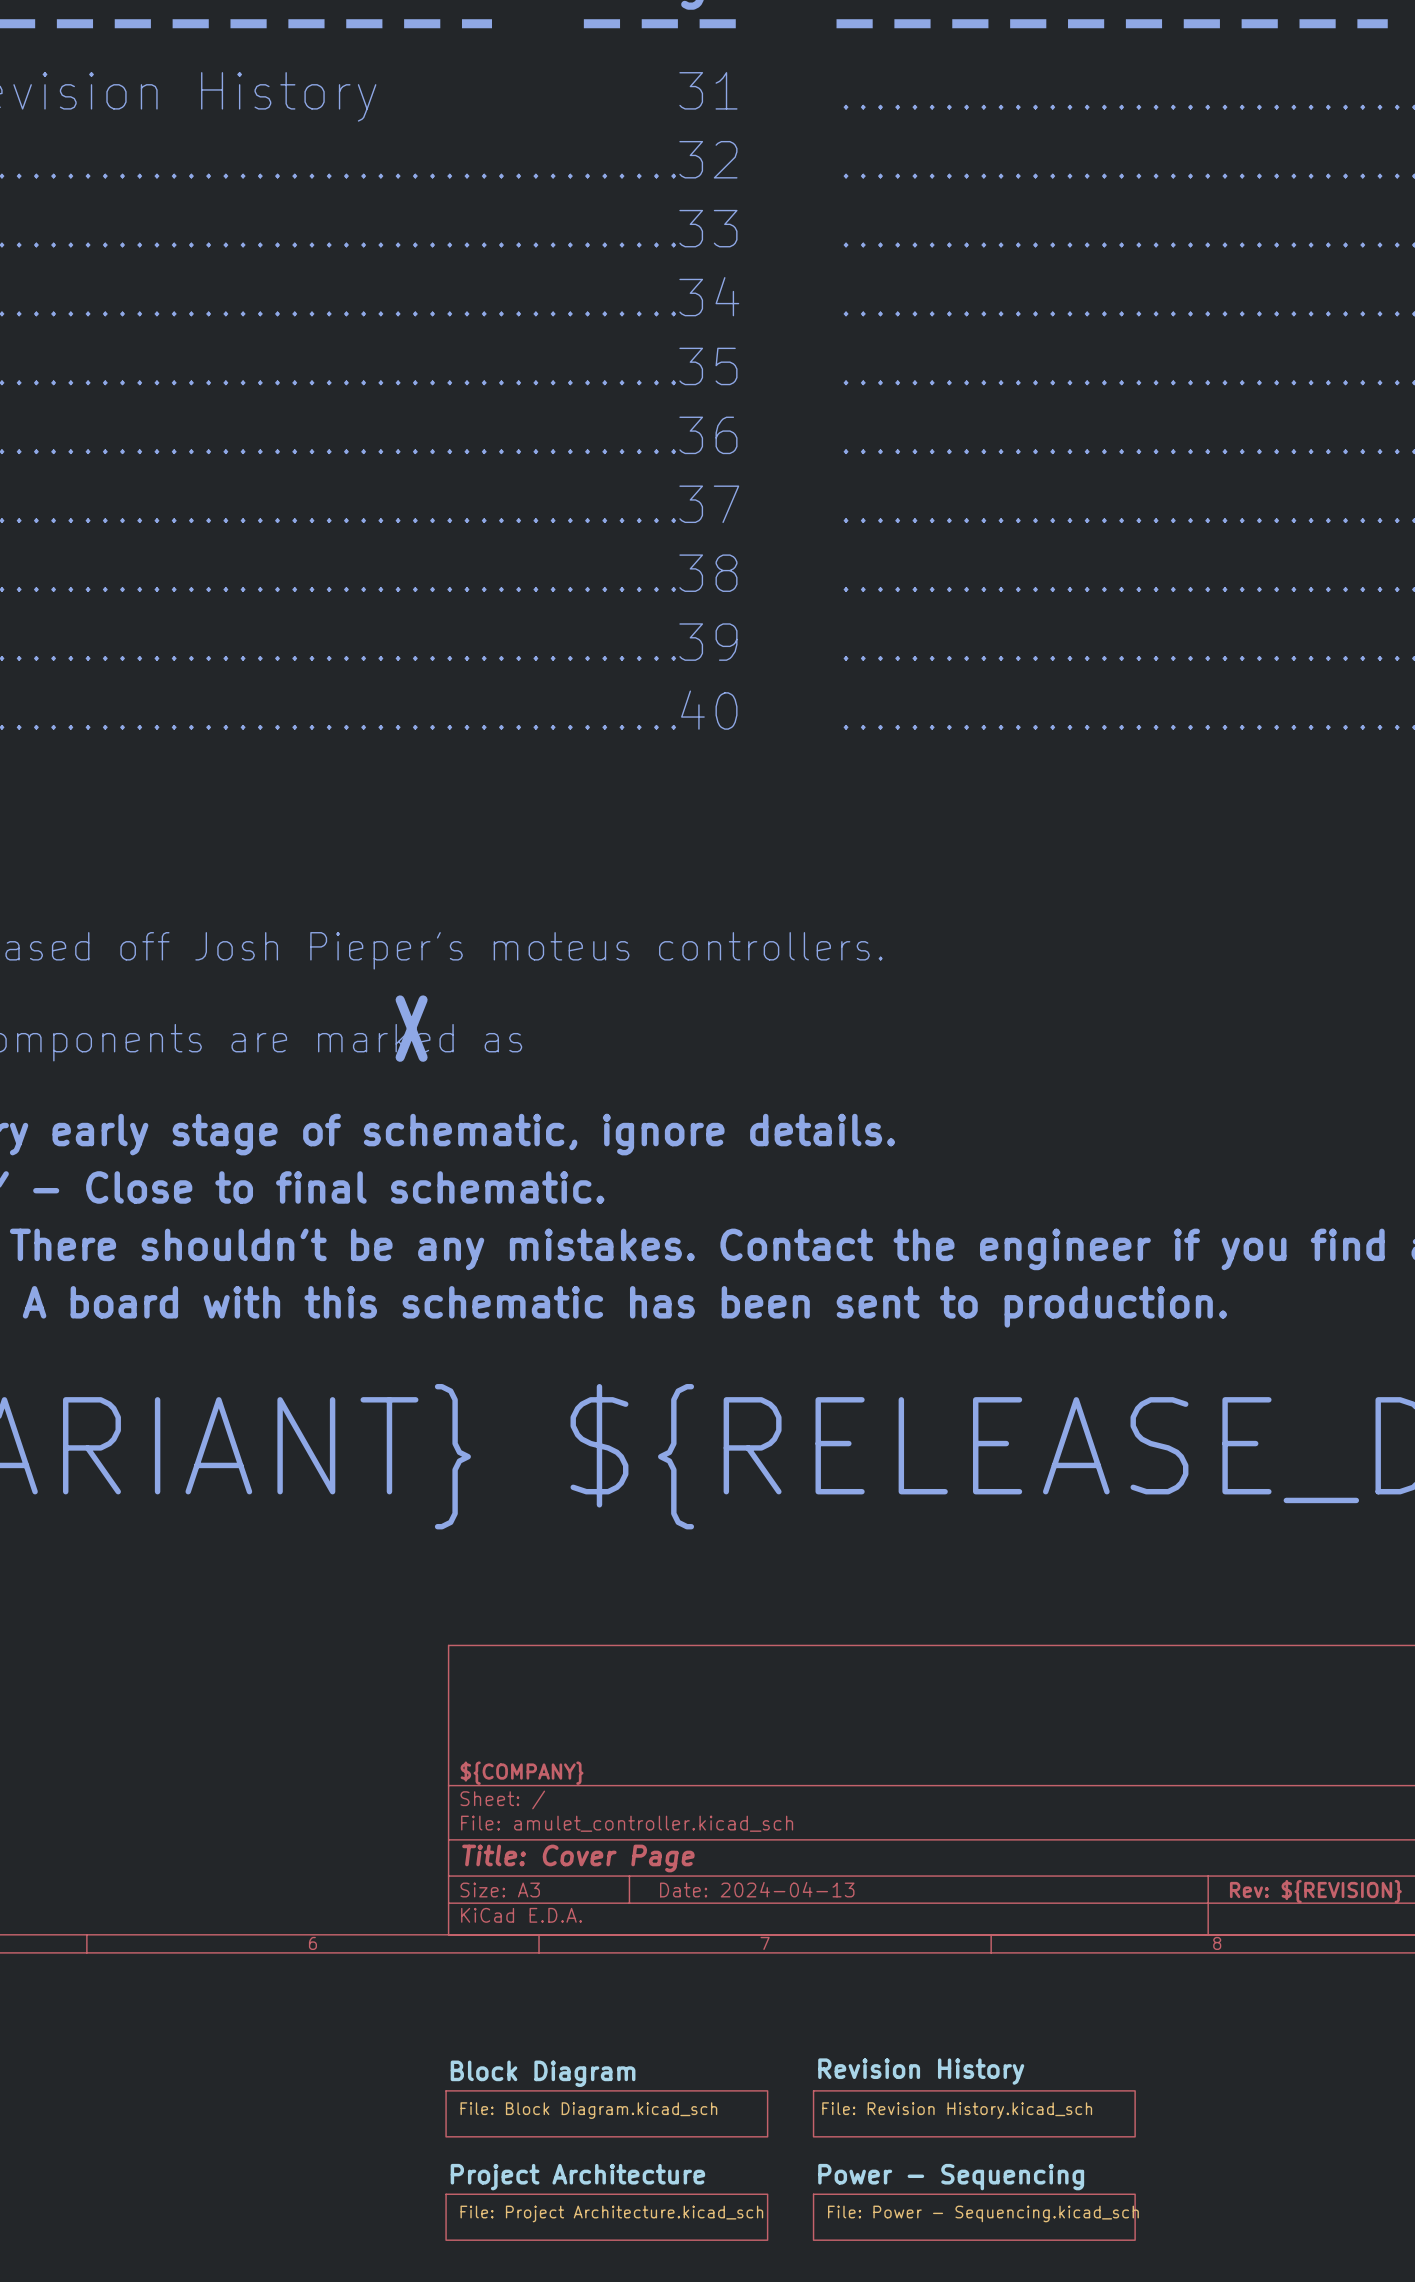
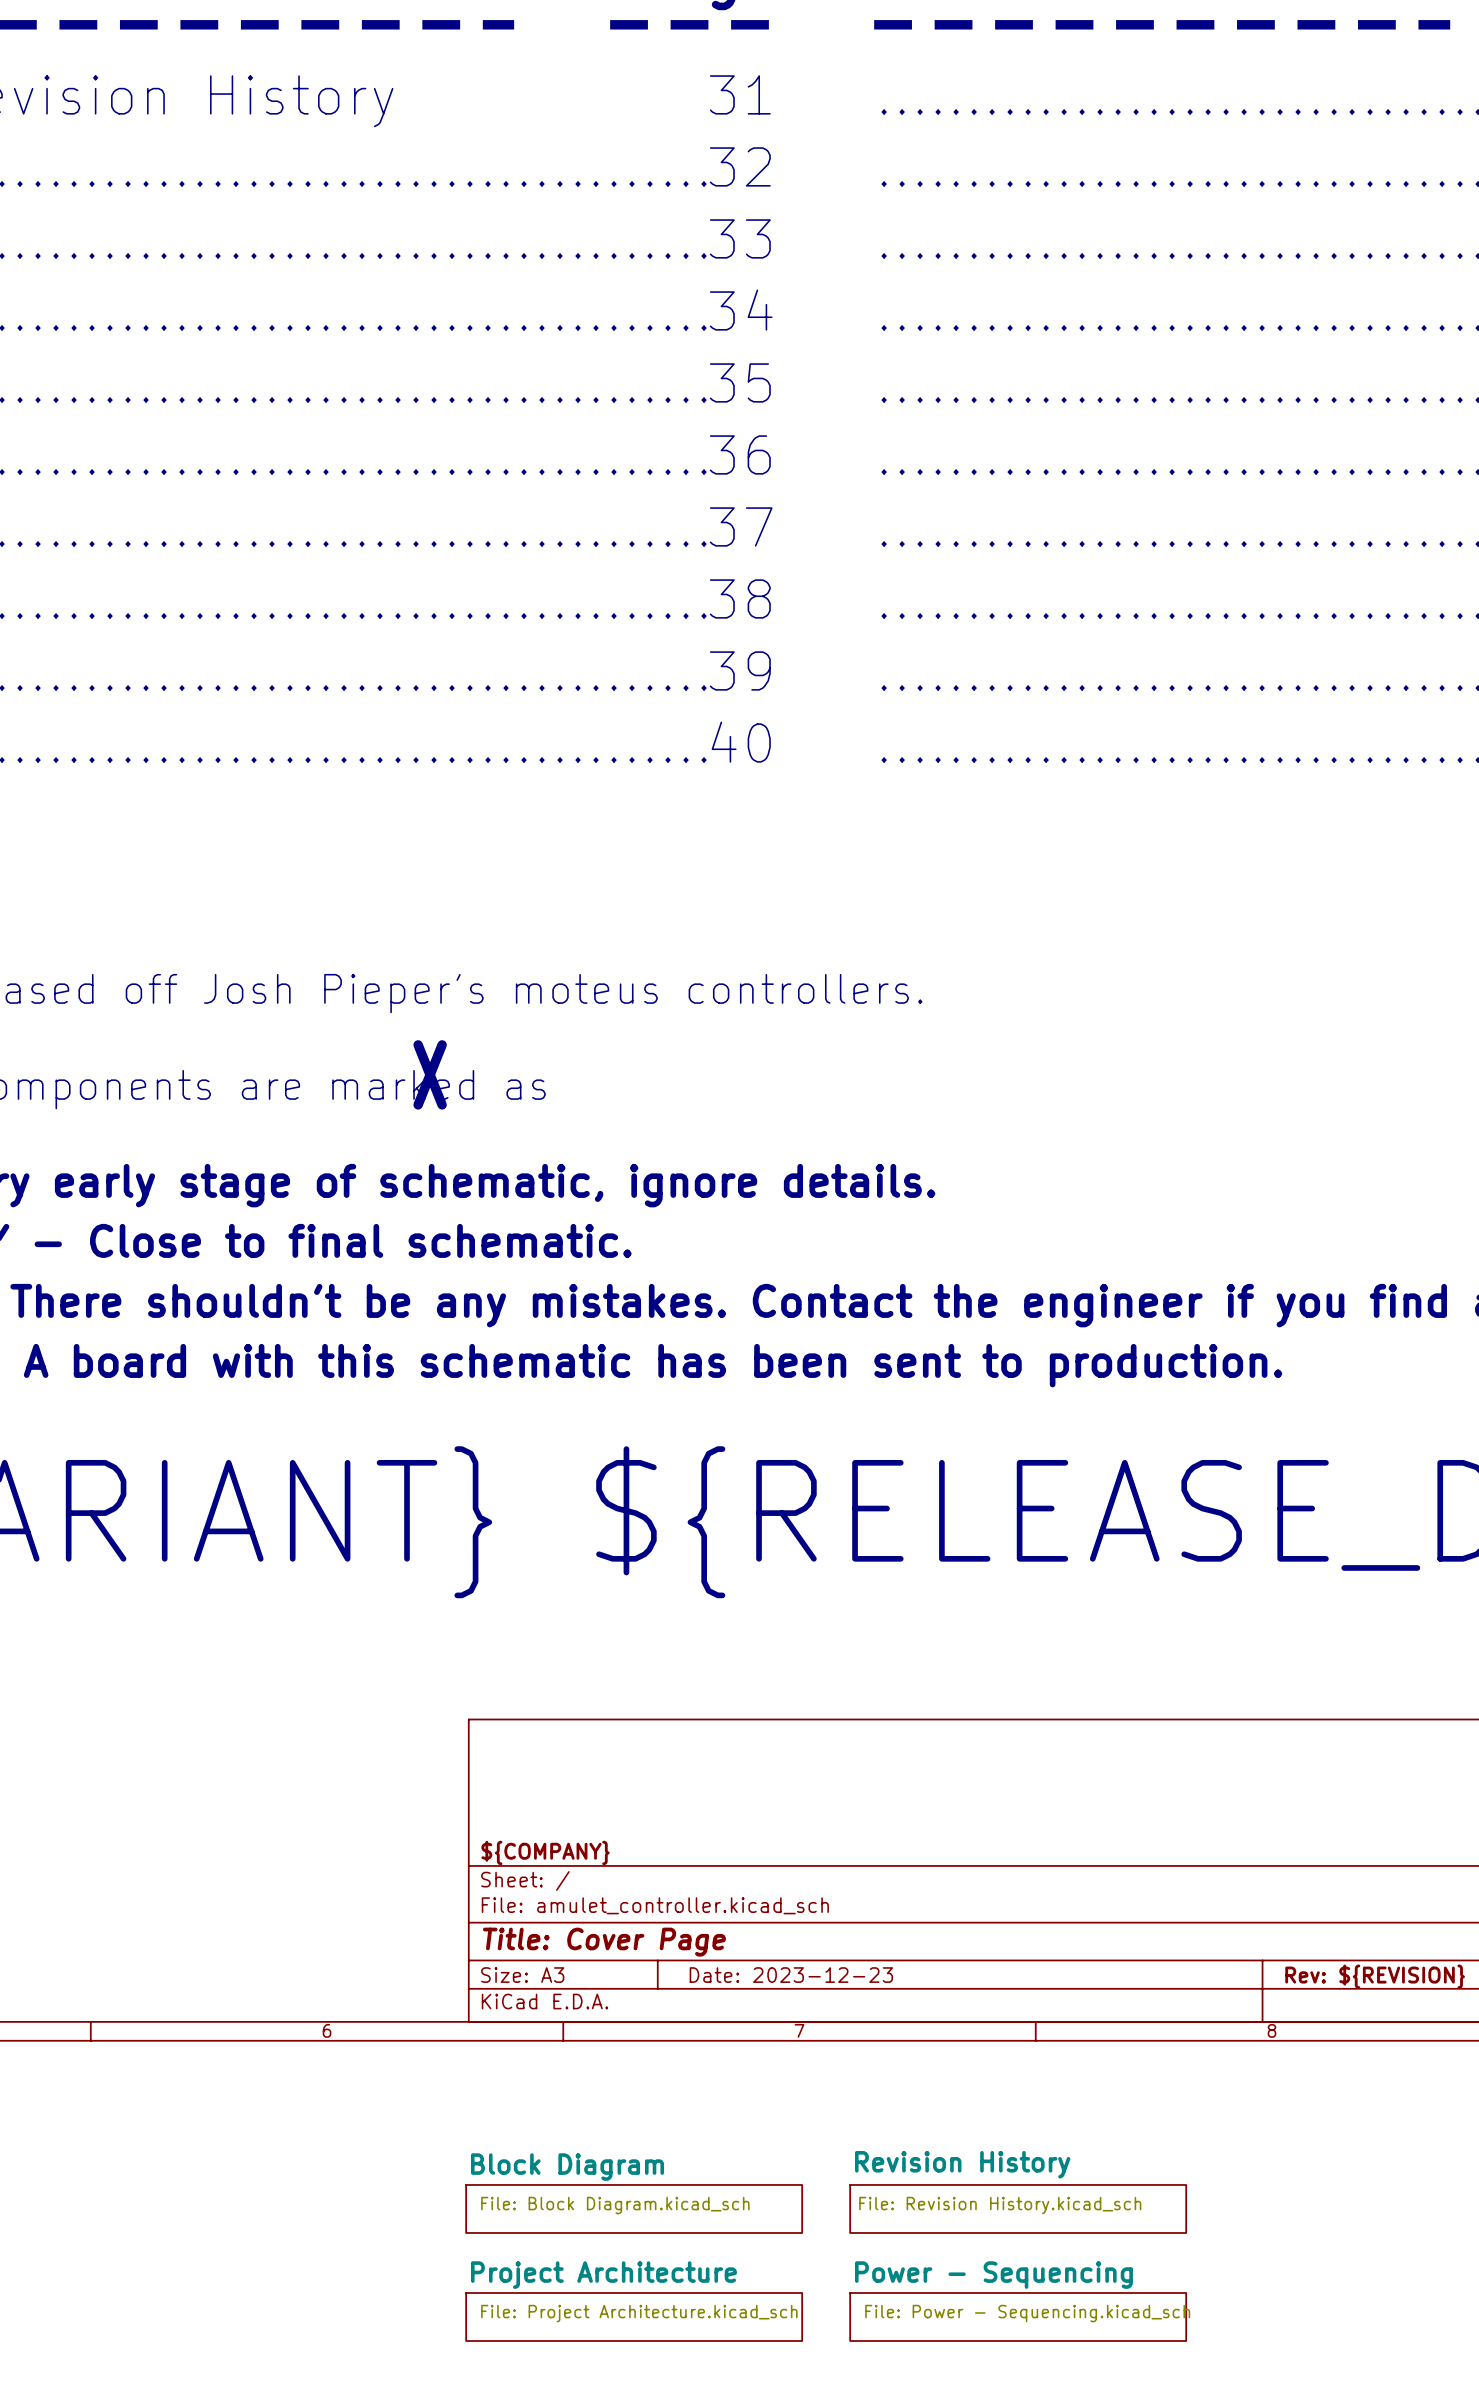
title block: Date: 2024-04-13 (757, 1889) -> Date: 2023-12-23 (791, 1975)

